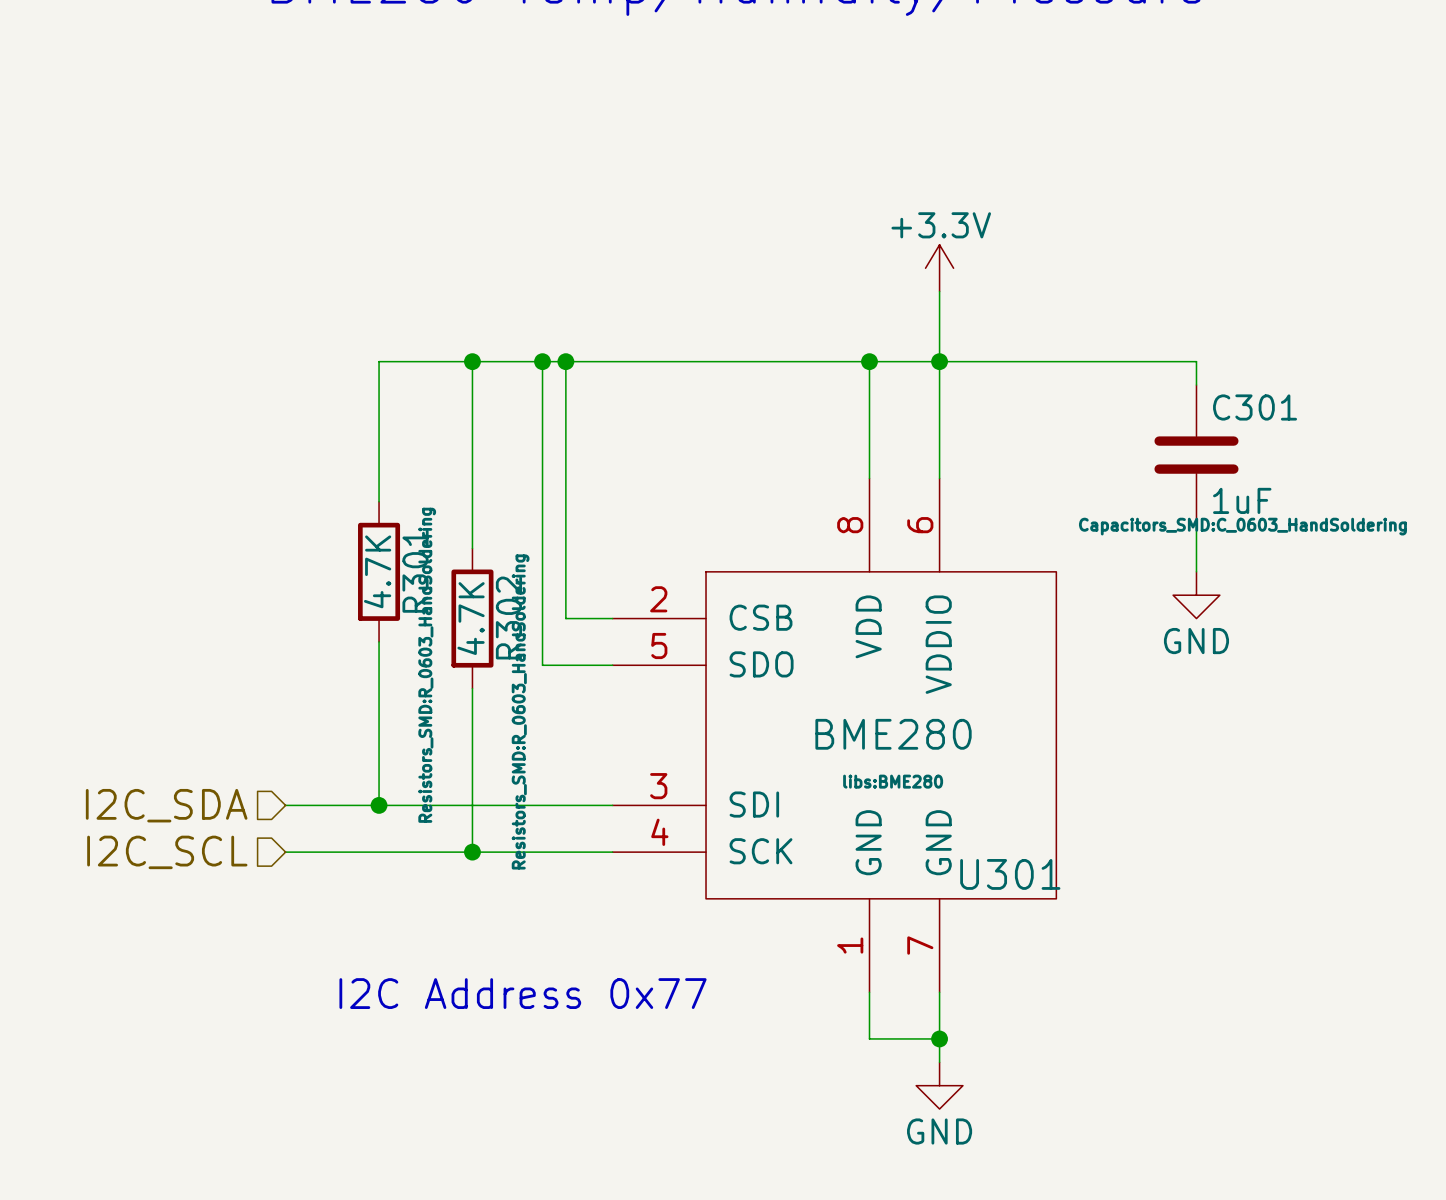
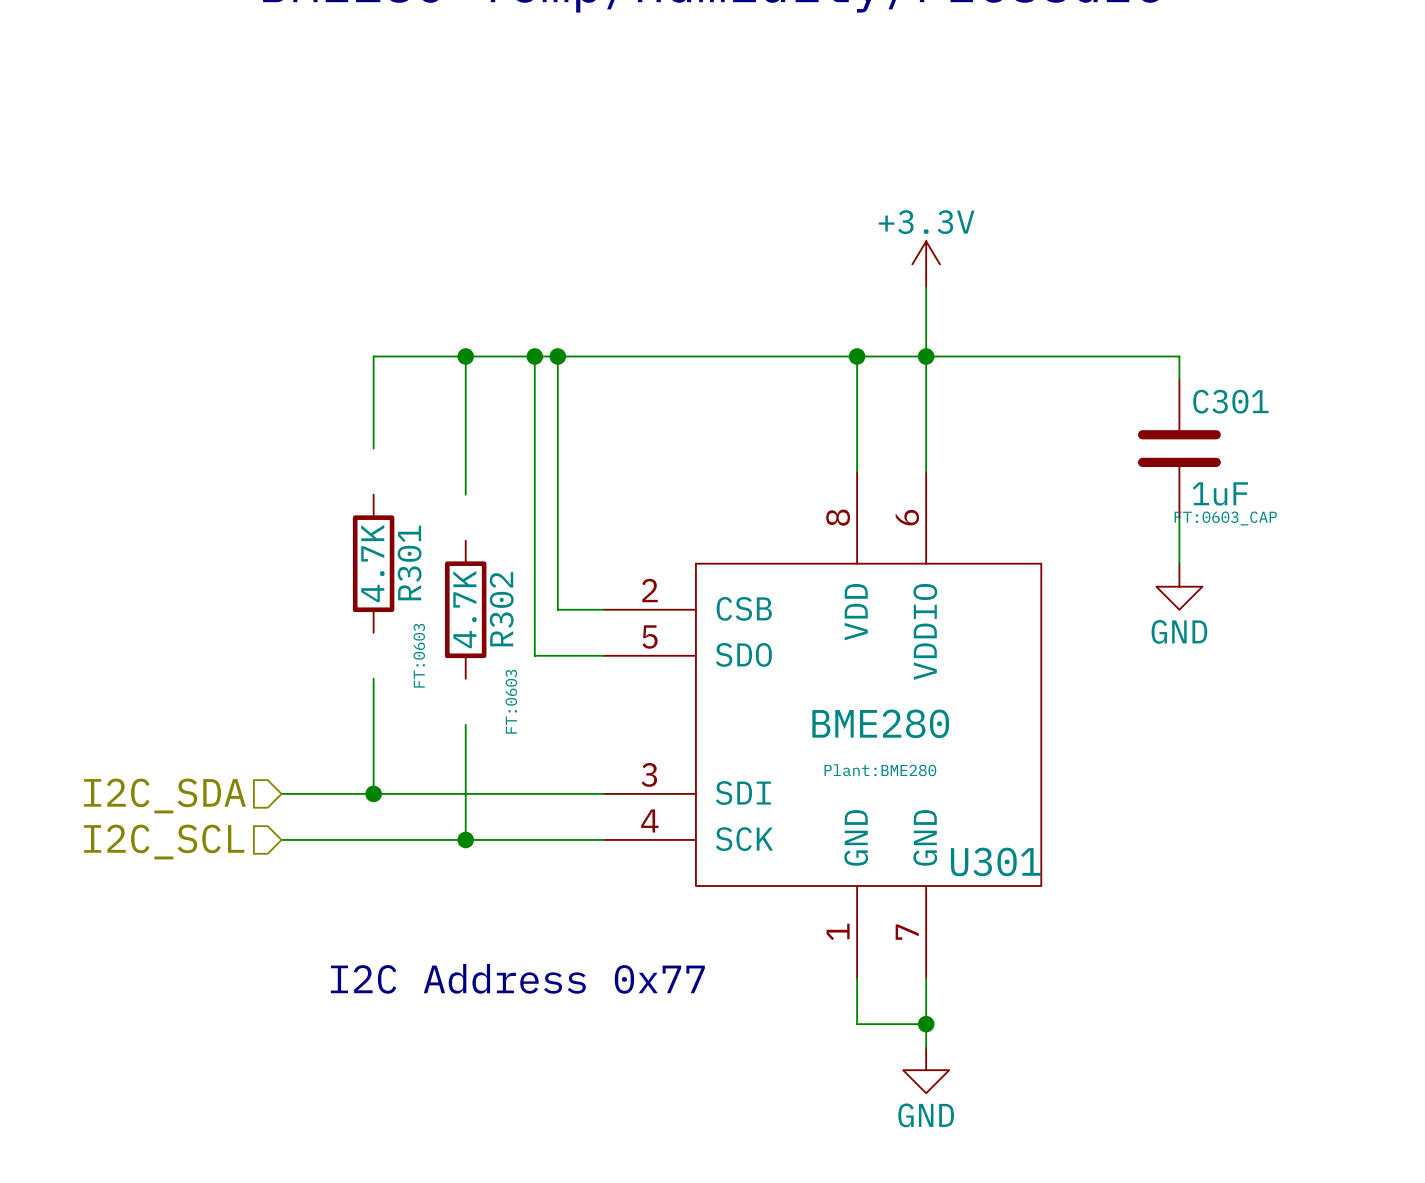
wire: (379, 455) (379, 501) -> none
wire: (472, 501) (472, 548) -> none
C301 text: Capacitors_SMD:C_0603_HandSoldering (1242, 526) -> FT:0603_CAP (1225, 518)
wire: (379, 641) (379, 688) -> none
R301 text: Resistors_SMD:R_0603_HandSoldering (427, 665) -> FT:0603 (419, 655)
wire: (472, 688) (472, 735) -> none
R302 text: Resistors_SMD:R_0603_HandSoldering (520, 711) -> FT:0603 (511, 701)
U301 text: libs:BME280 (893, 781) -> Plant:BME280 (880, 770)

